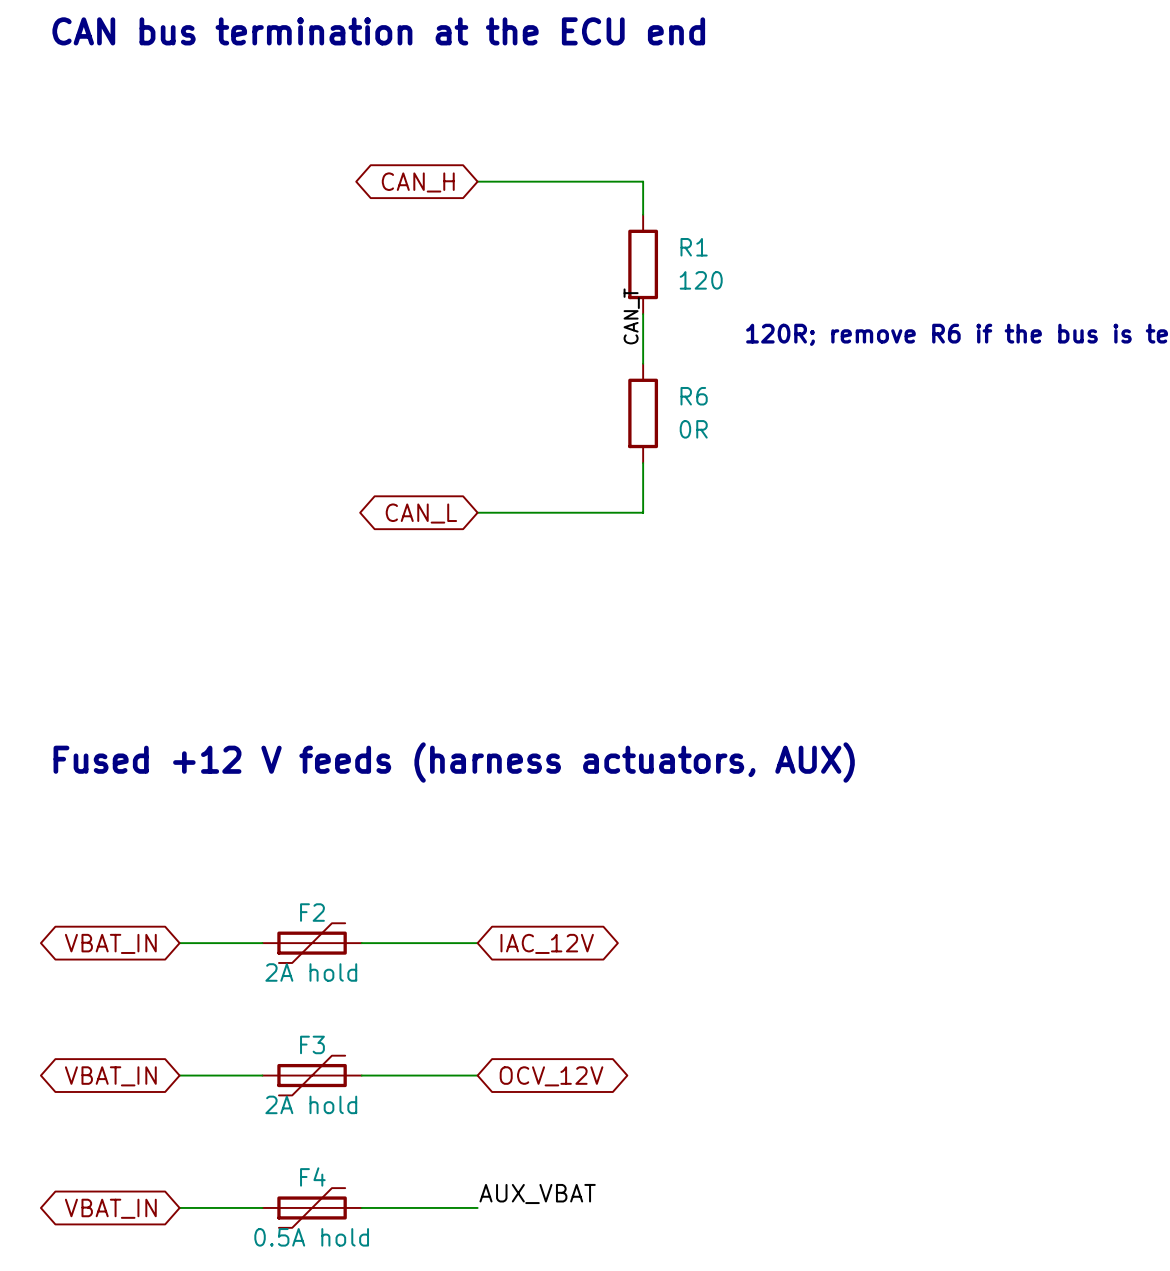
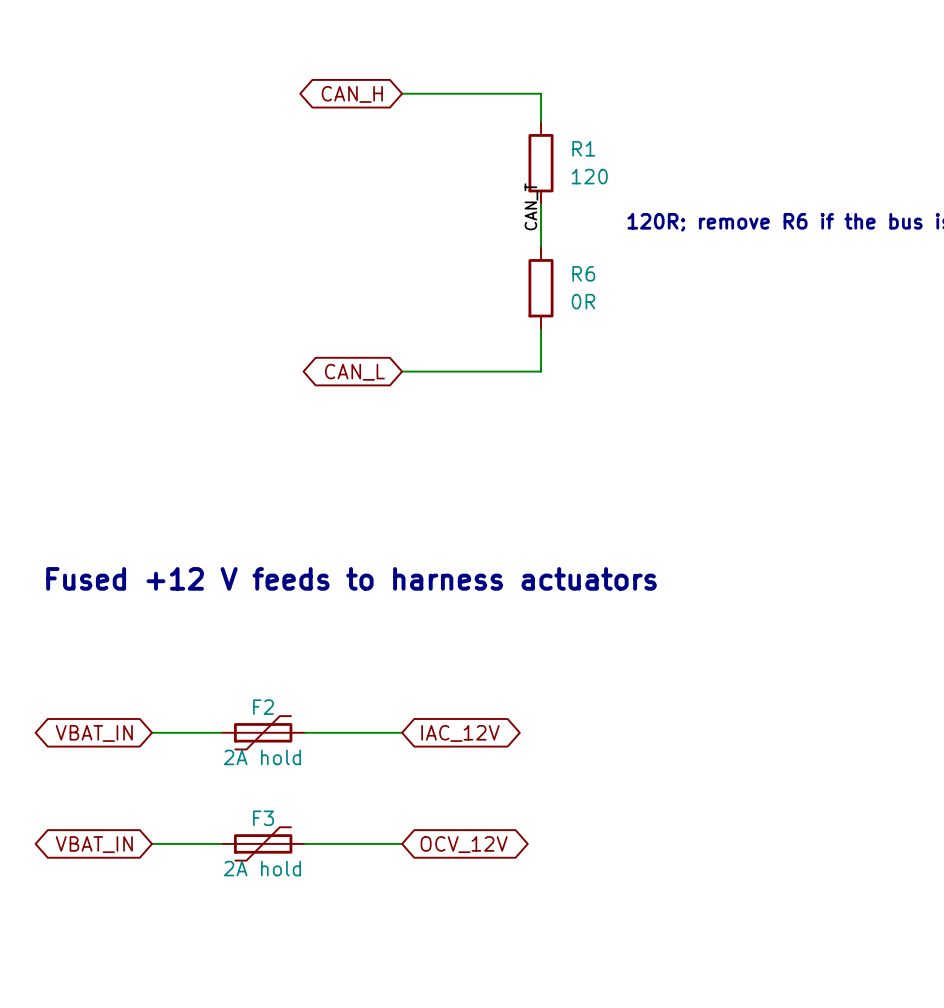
text: Fused +12 V feeds (harness actuators, AUX) (454, 762) -> Fused +12 V feeds to harness actuators (351, 578)
label: AUX_VBAT (537, 1193) -> none
wire: (179, 1207) (262, 1207) -> none
F4: 0.5A hold (312, 1207) -> none
wire: (361, 1207) (477, 1207) -> none
global label: VBAT_IN (110, 1208) -> none

